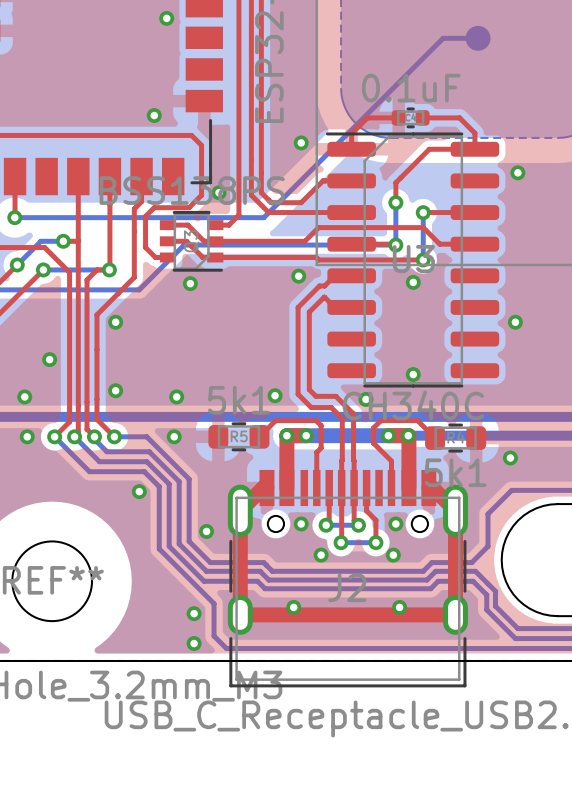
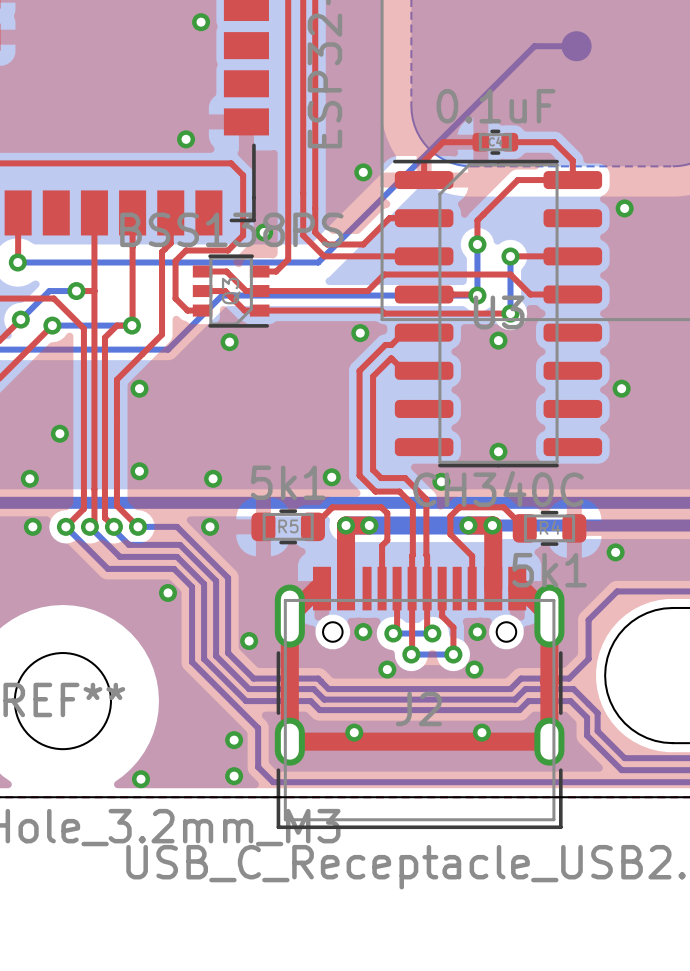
via: none -> (141, 779)

